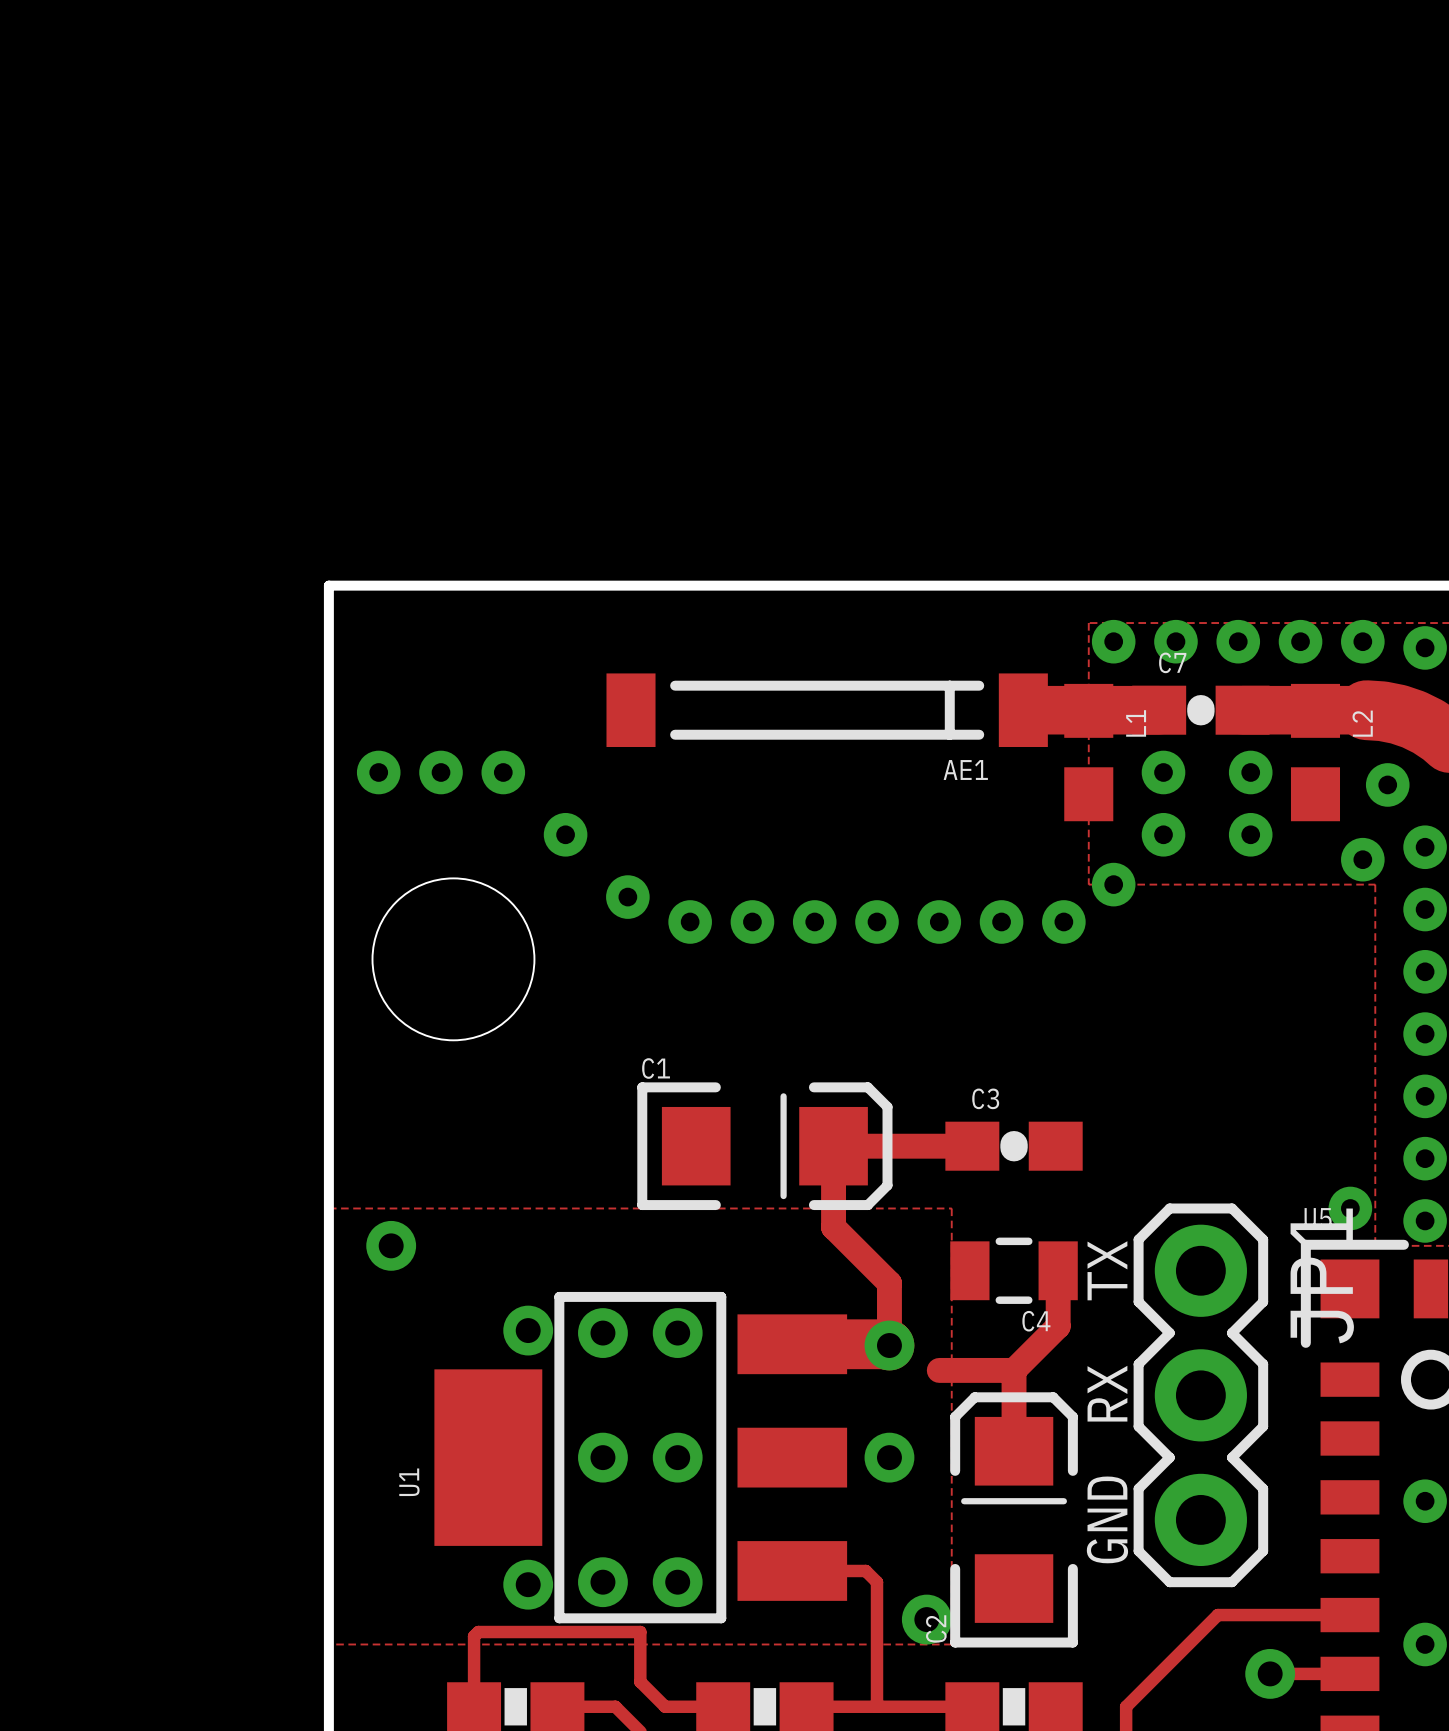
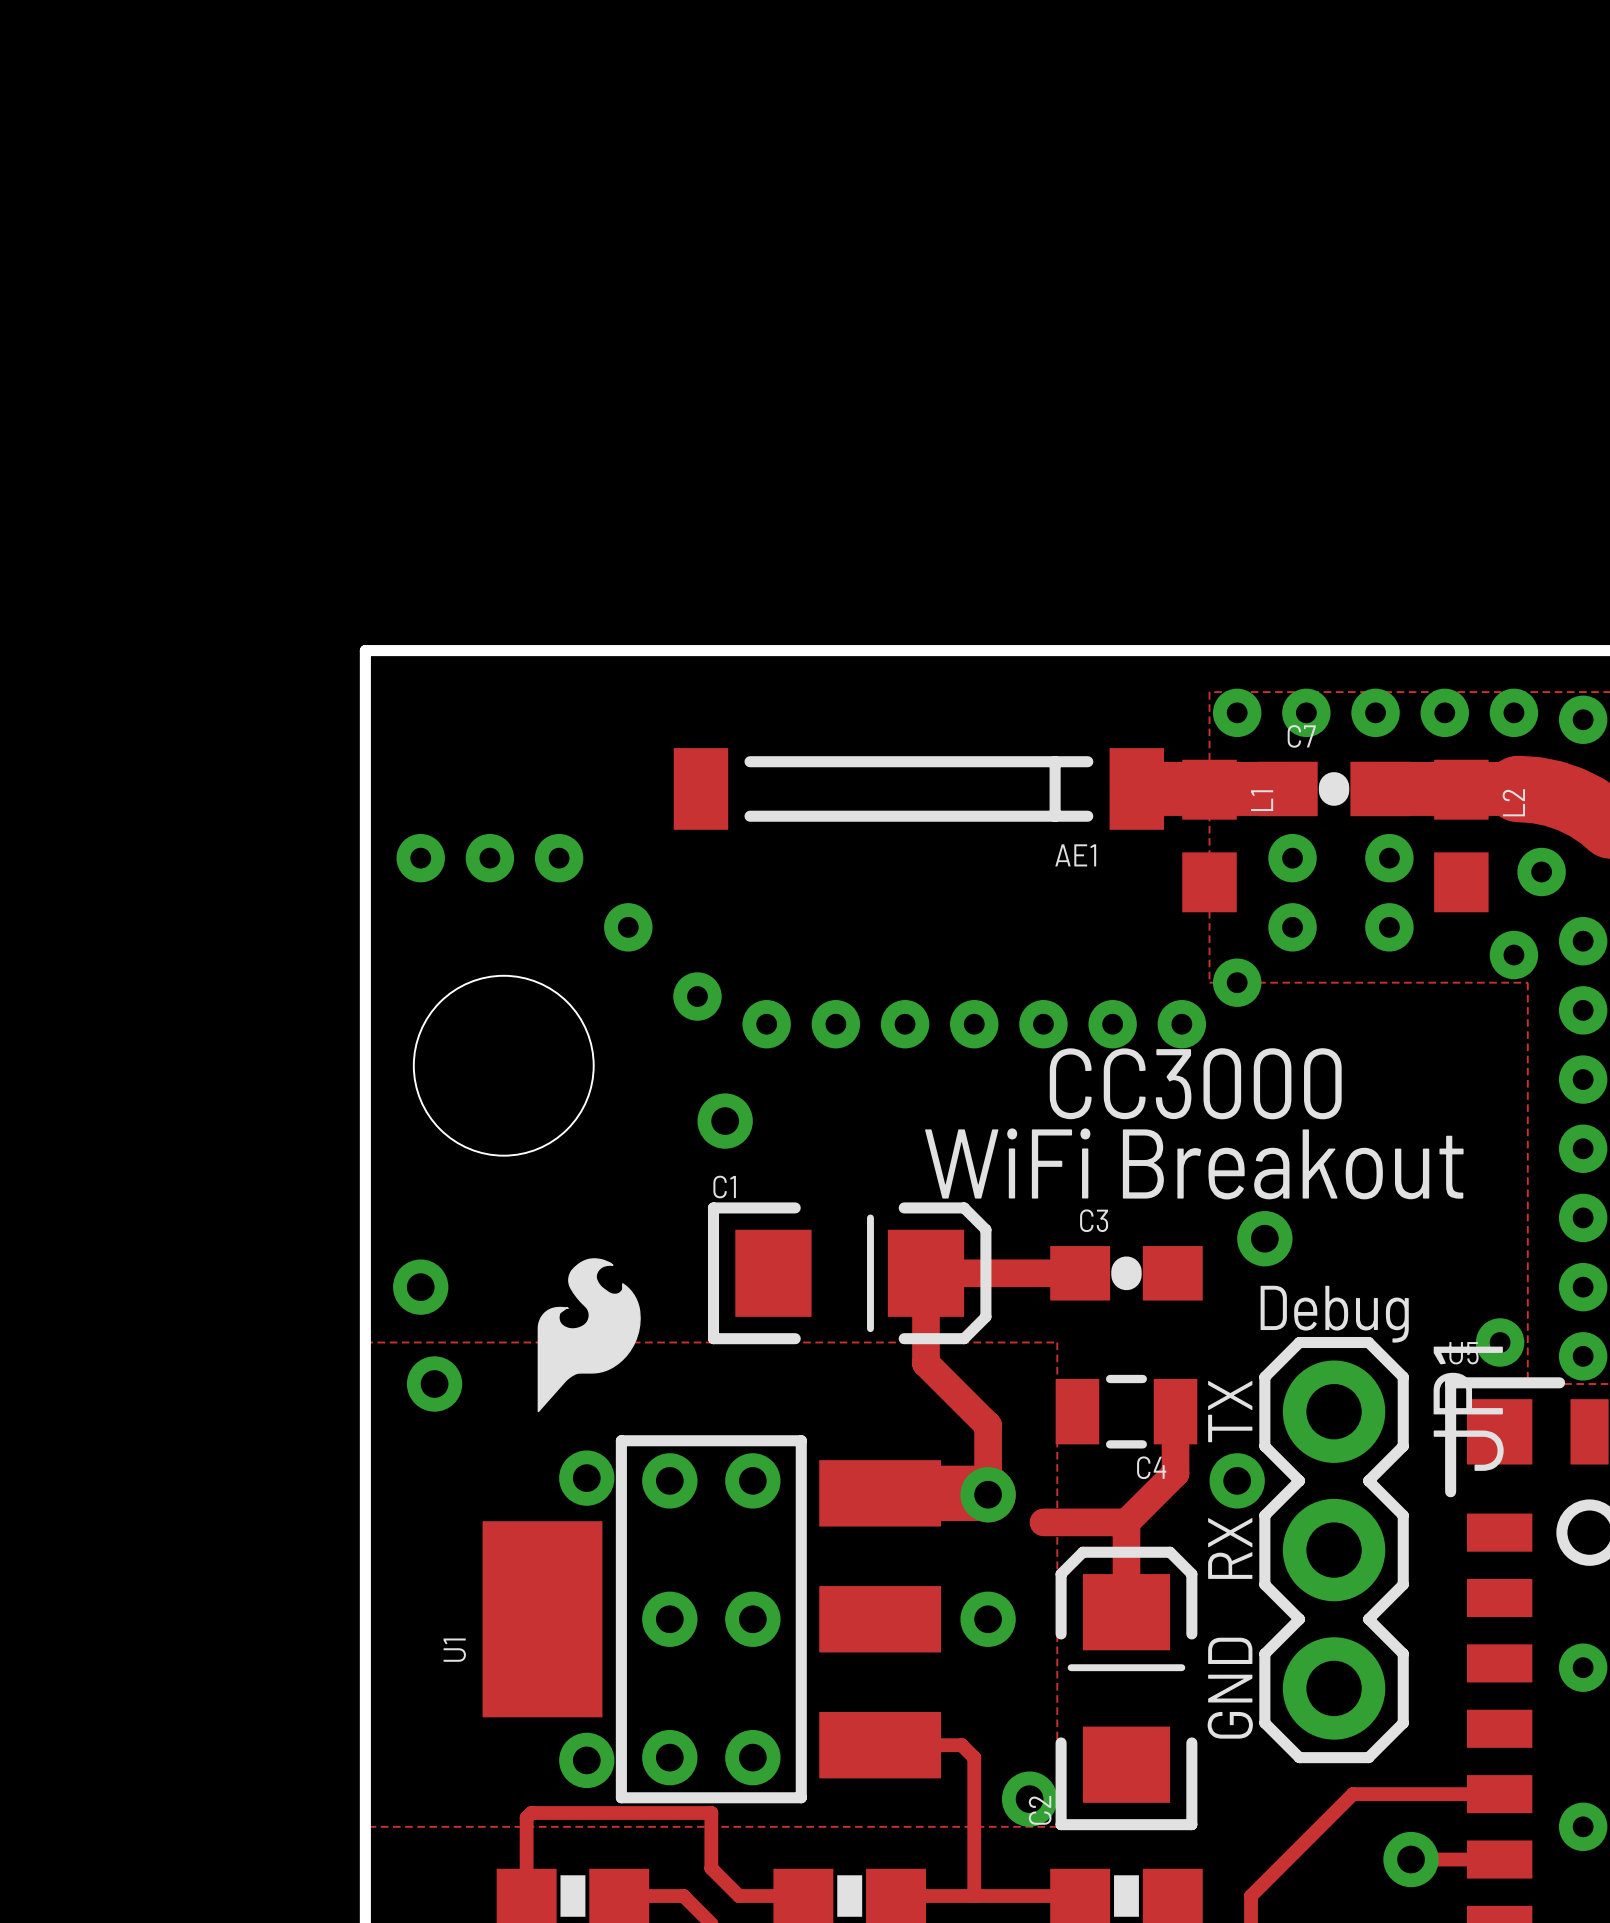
text: none -> CC3000 (1195, 1083)
via: none -> (725, 1121)
text: none -> WiFi Breakout (1194, 1163)
via: none -> (1264, 1238)
drawing: none -> [537, 1258, 641, 1413]
via: none -> (420, 1287)
text: none -> Debug (1334, 1314)
via: none -> (1237, 1480)

